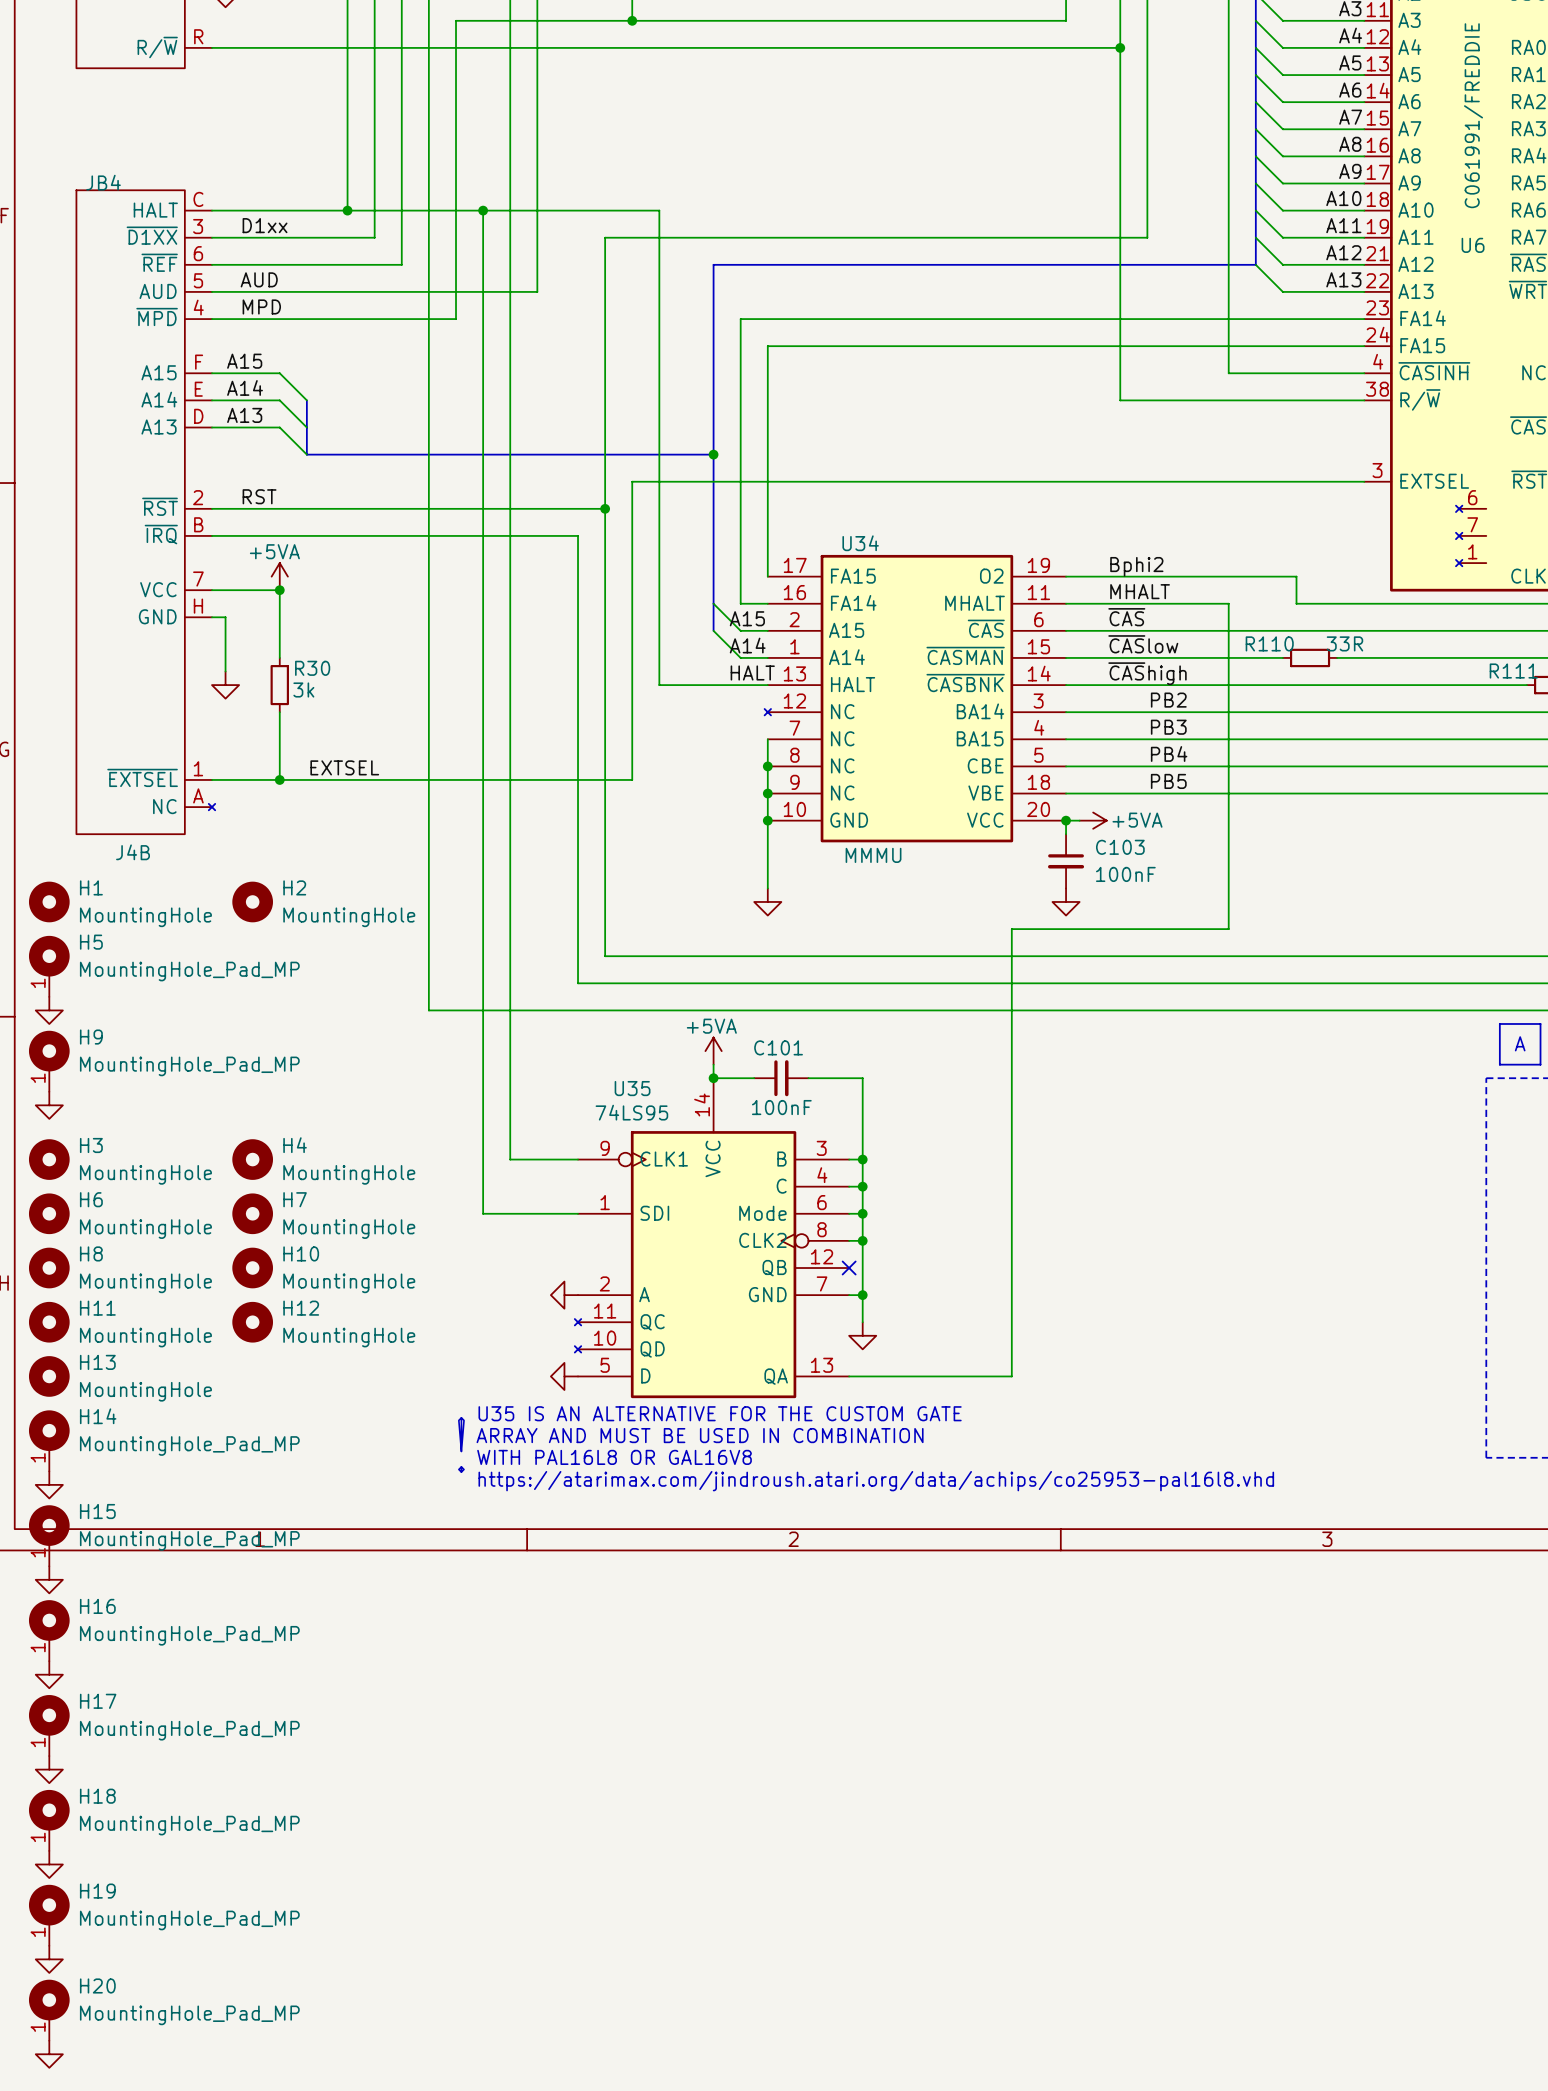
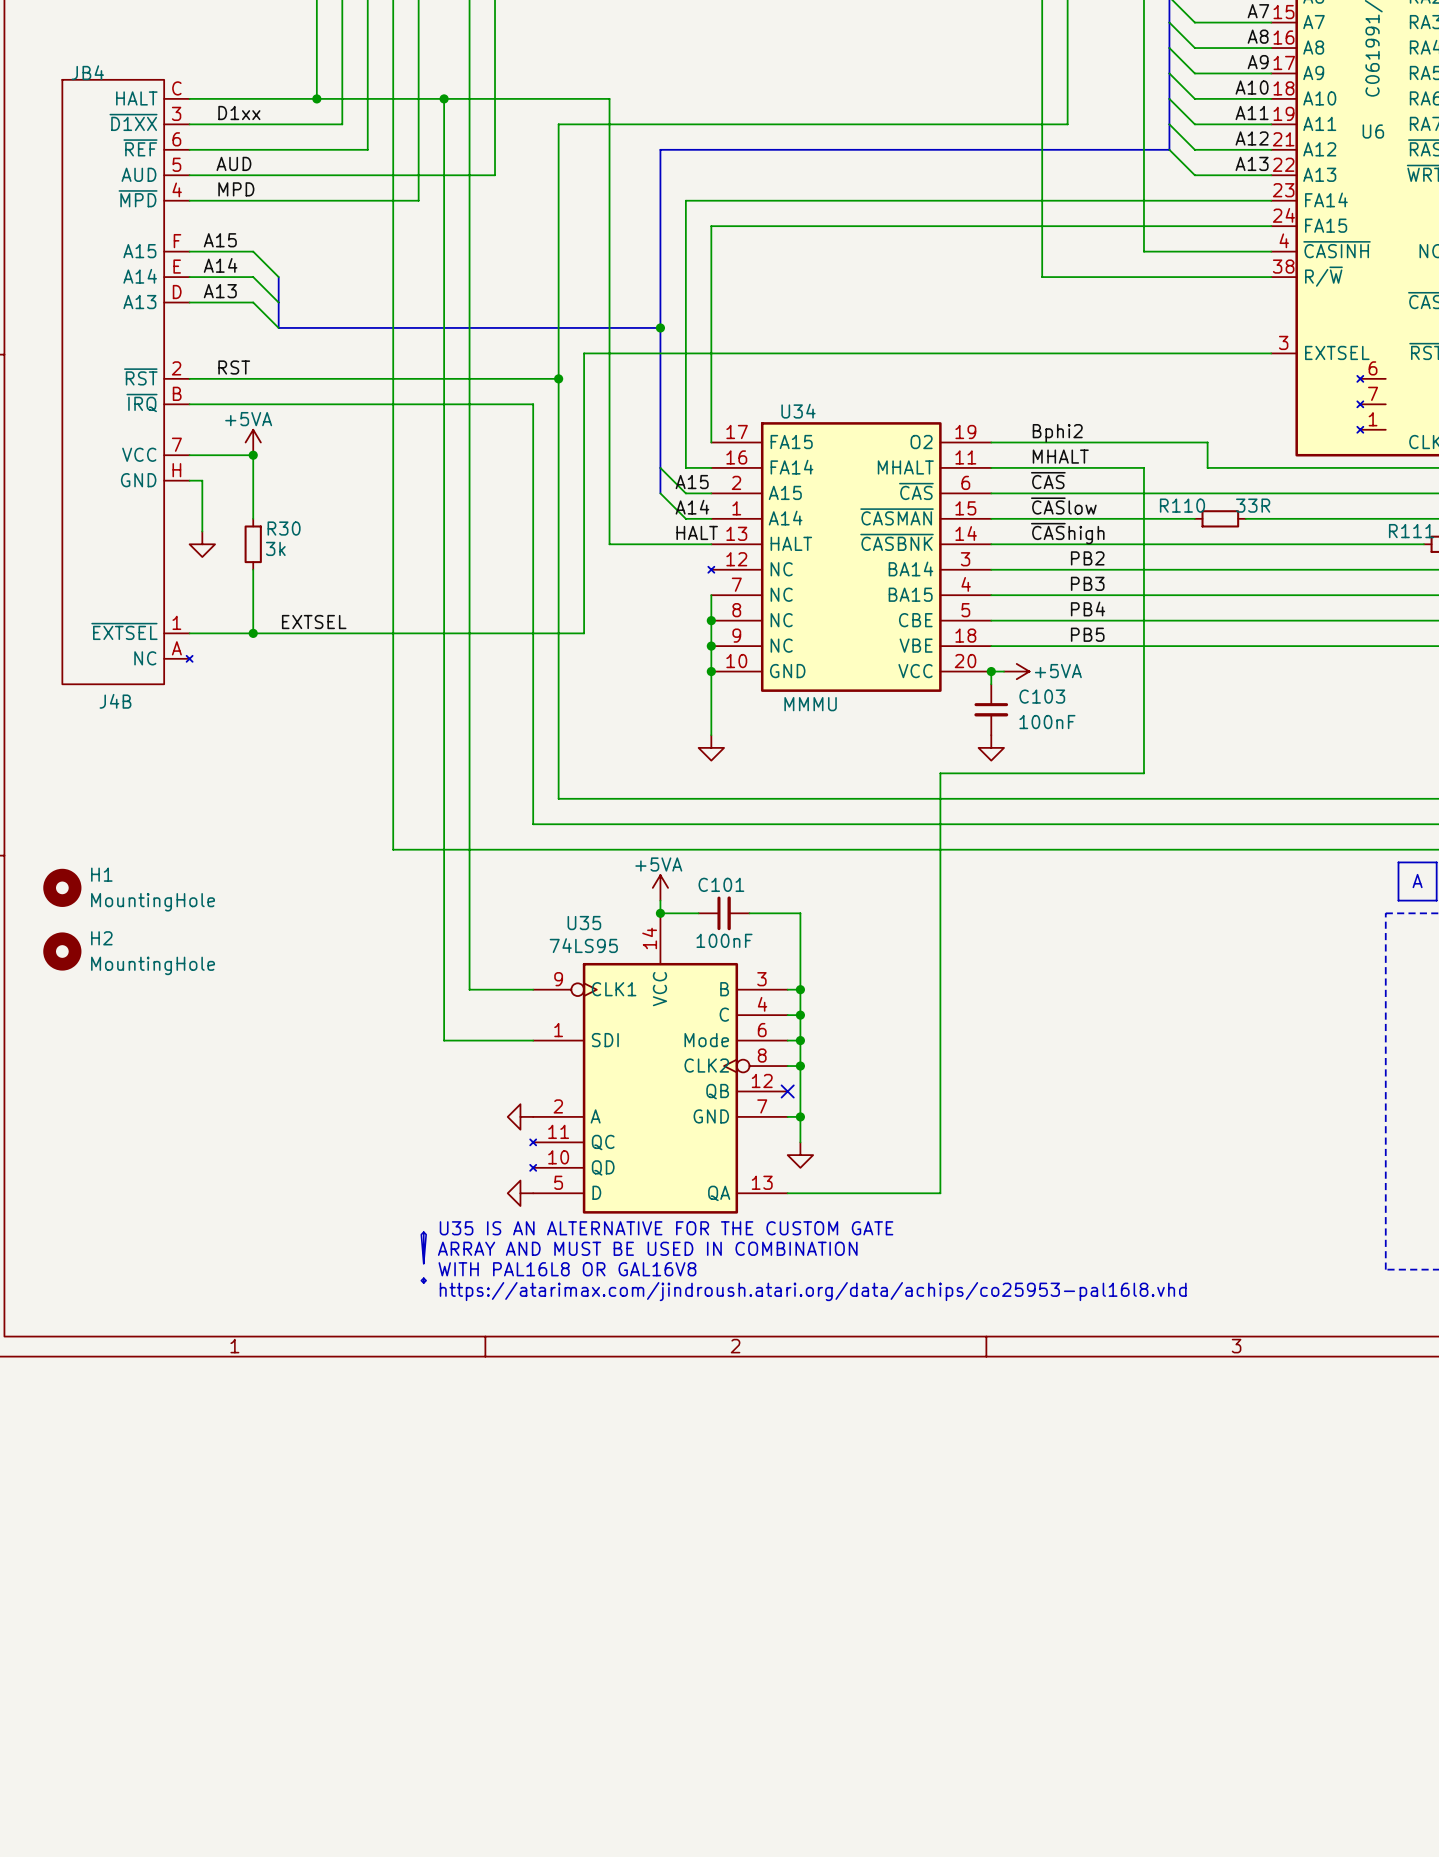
H1 position: (49, 901) -> (62, 887)
H2 position: (252, 901) -> (62, 951)
H5: MountingHole_Pad_MP (49, 966) -> none
power symbol: (49, 1010) -> none
H9: MountingHole_Pad_MP (49, 1061) -> none
power symbol: (49, 1105) -> none
H3: MountingHole (49, 1159) -> none
H4: MountingHole (252, 1159) -> none
H6: MountingHole (49, 1213) -> none
H7: MountingHole (252, 1213) -> none
H8: MountingHole (49, 1268) -> none
H10: MountingHole (252, 1268) -> none
H11: MountingHole (49, 1322) -> none
H12: MountingHole (252, 1322) -> none
H13: MountingHole (49, 1376) -> none
H14: MountingHole_Pad_MP (49, 1440) -> none
power symbol: (49, 1484) -> none
H15: MountingHole_Pad_MP (49, 1535) -> none
power symbol: (49, 1579) -> none
H16: MountingHole_Pad_MP (49, 1630) -> none
power symbol: (49, 1674) -> none
H17: MountingHole_Pad_MP (49, 1725) -> none
power symbol: (49, 1769) -> none
H18: MountingHole_Pad_MP (49, 1820) -> none
power symbol: (49, 1864) -> none
H19: MountingHole_Pad_MP (49, 1915) -> none
power symbol: (49, 1959) -> none
H20: MountingHole_Pad_MP (49, 2010) -> none
power symbol: (49, 2054) -> none

